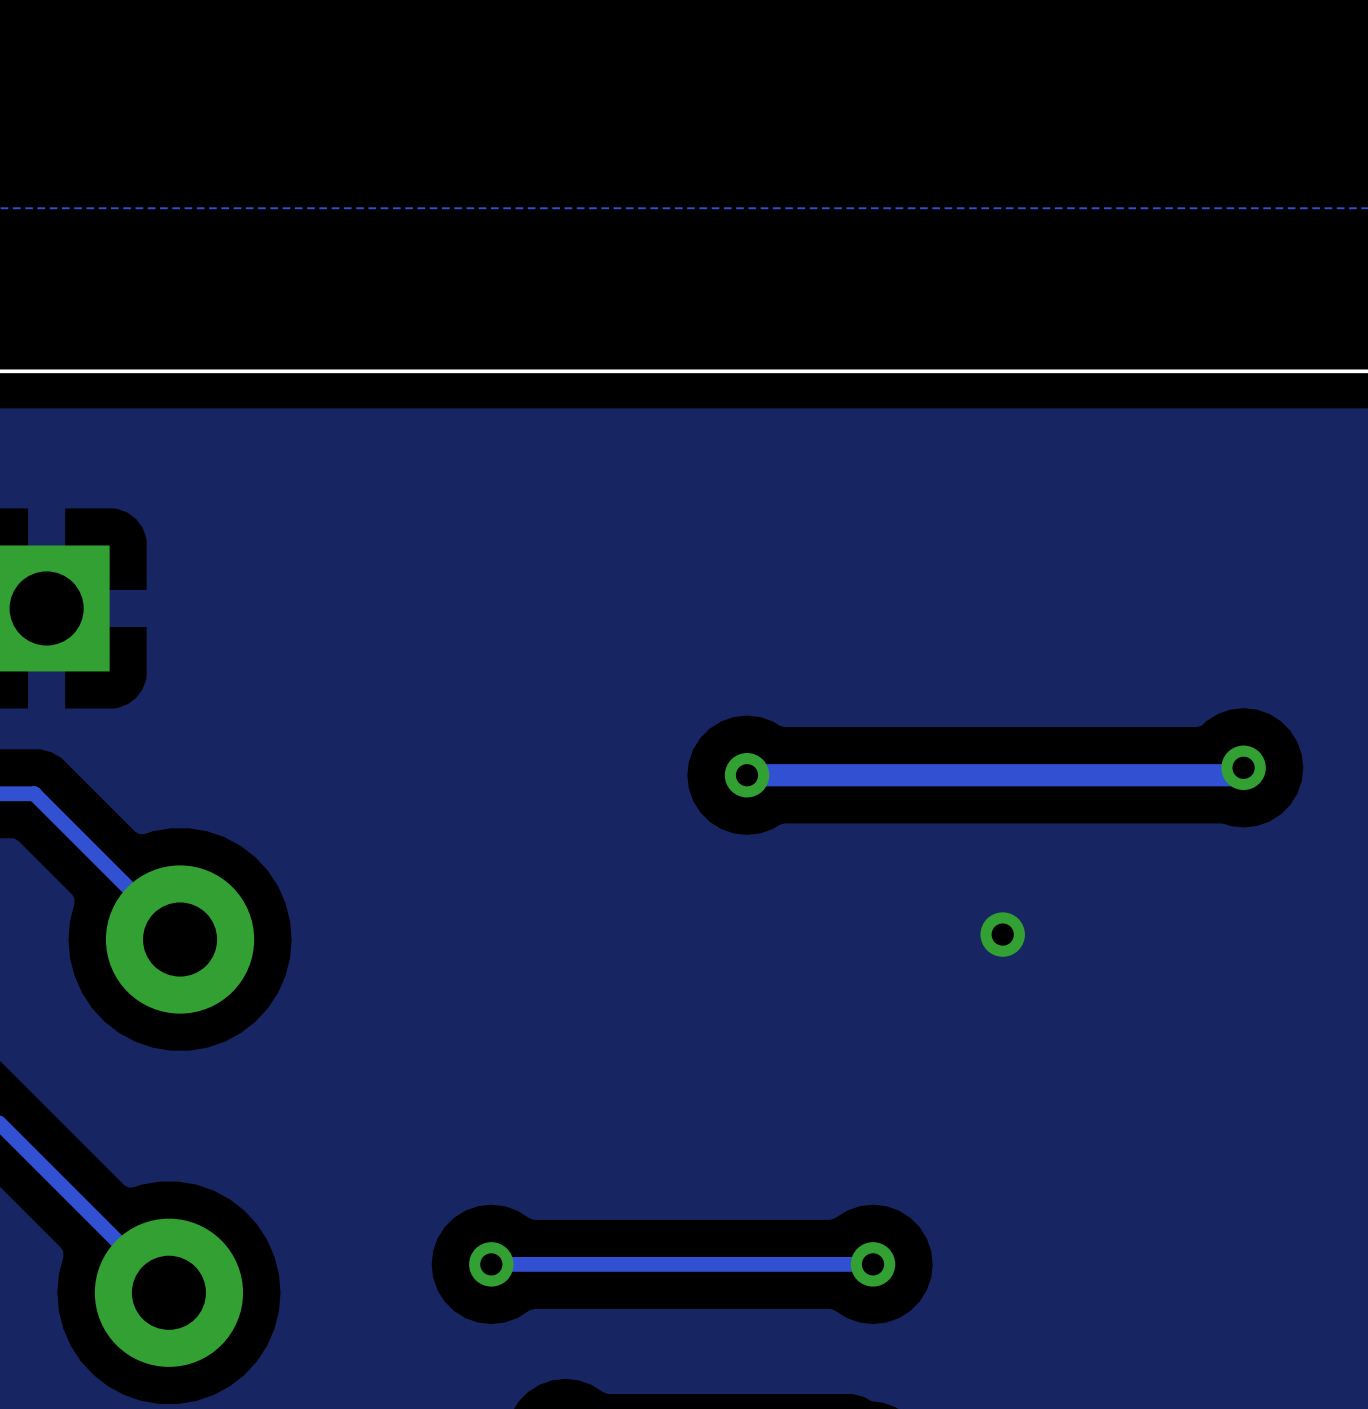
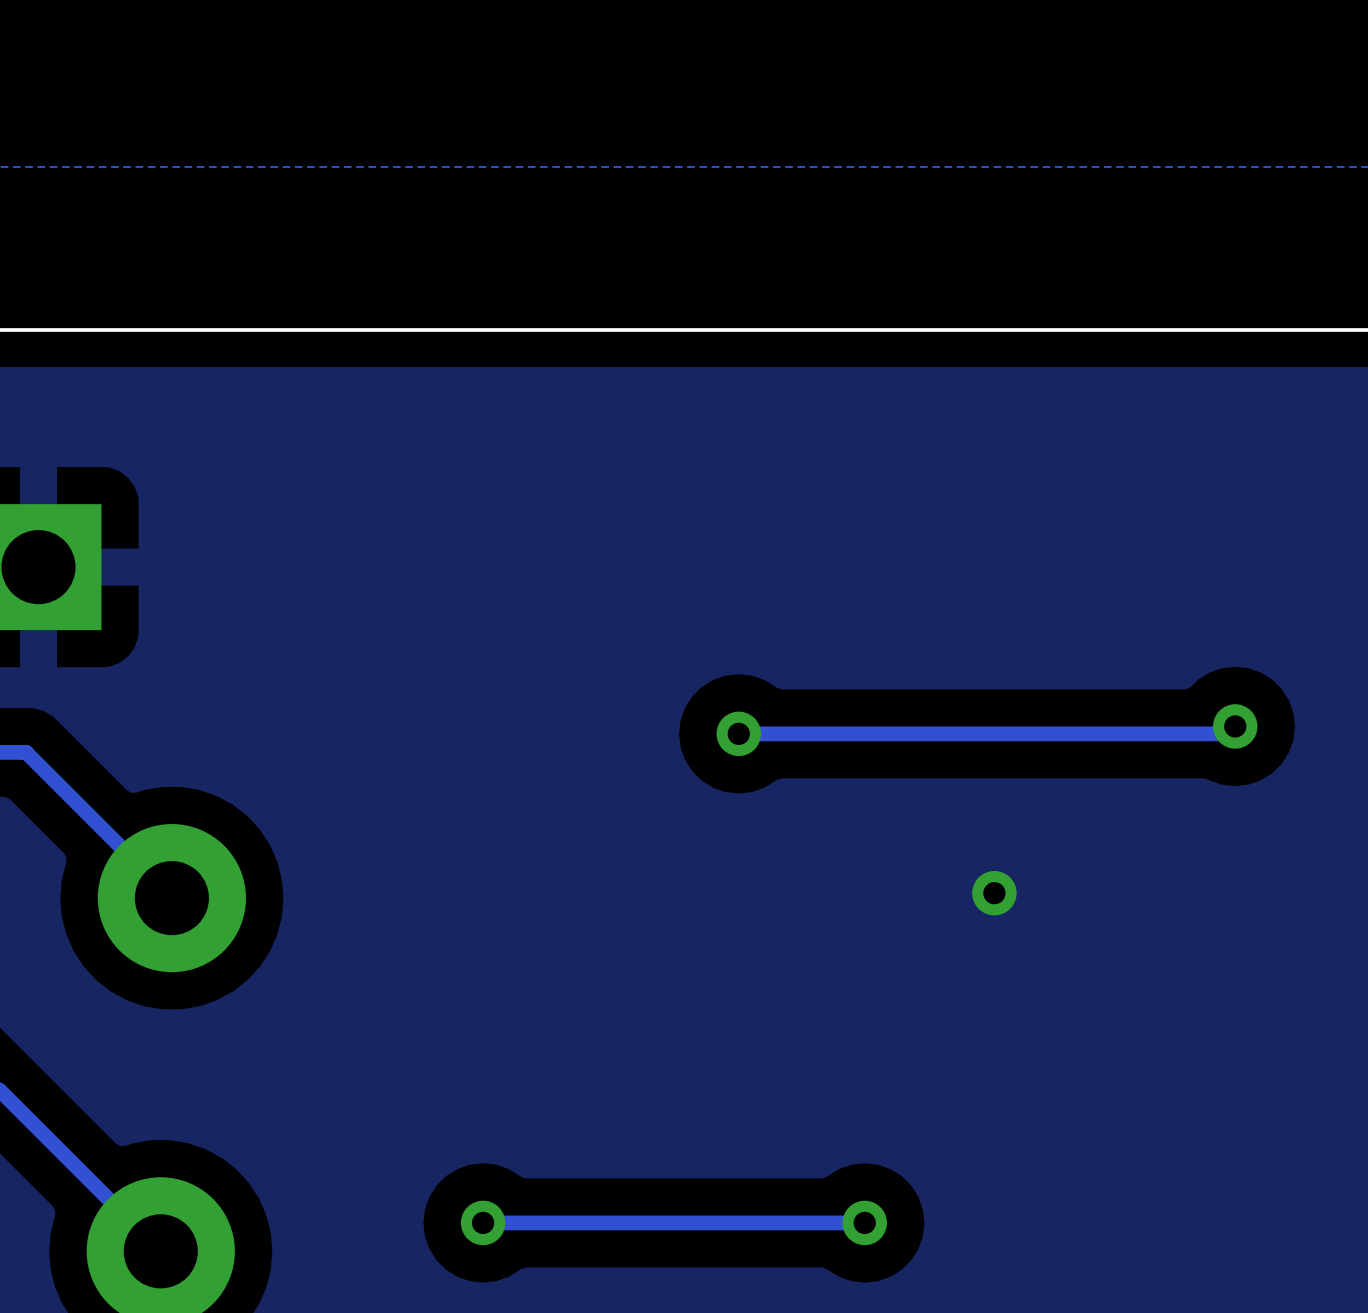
track width: thick (1236, 775) (747, 775) -> thin (1227, 733) (738, 733)

